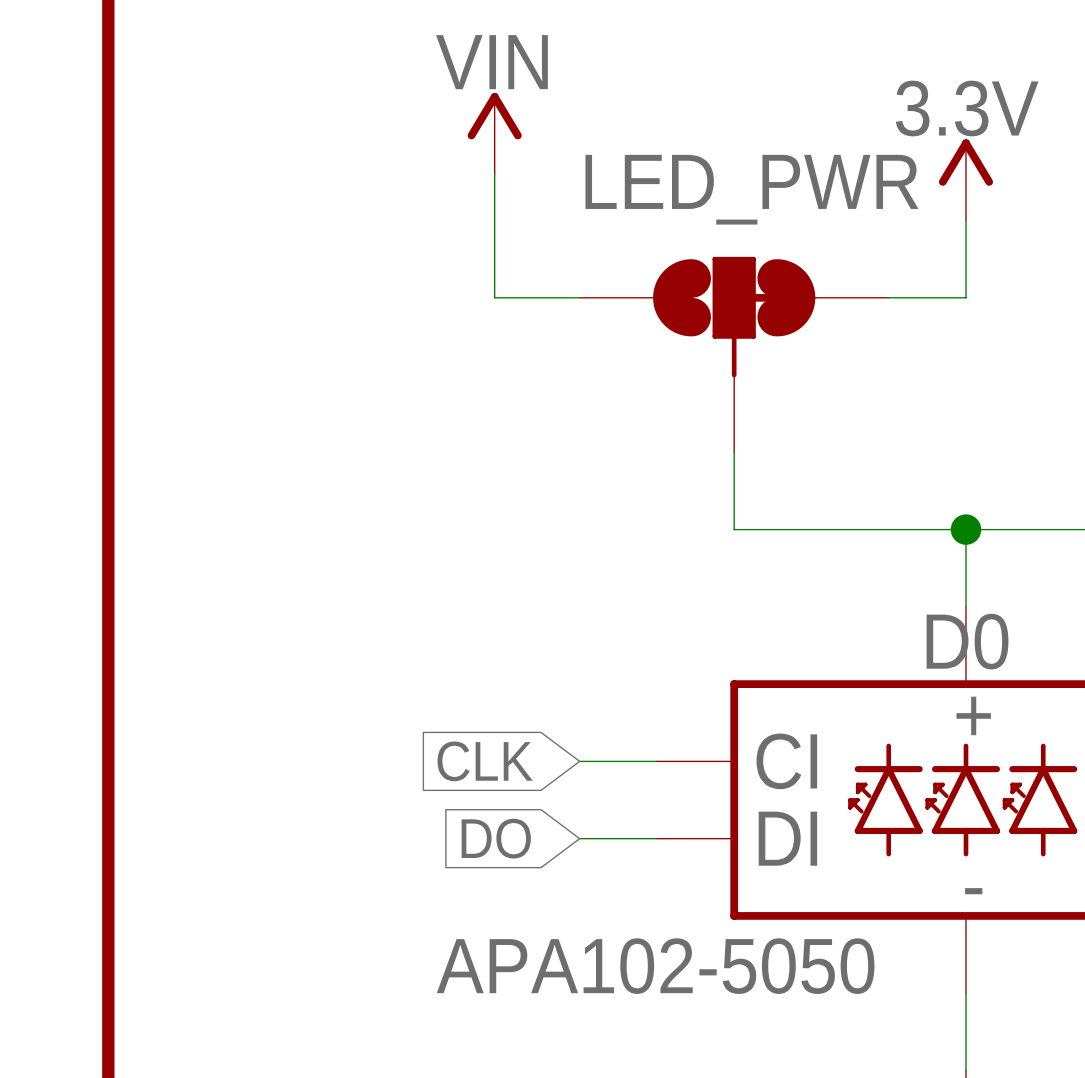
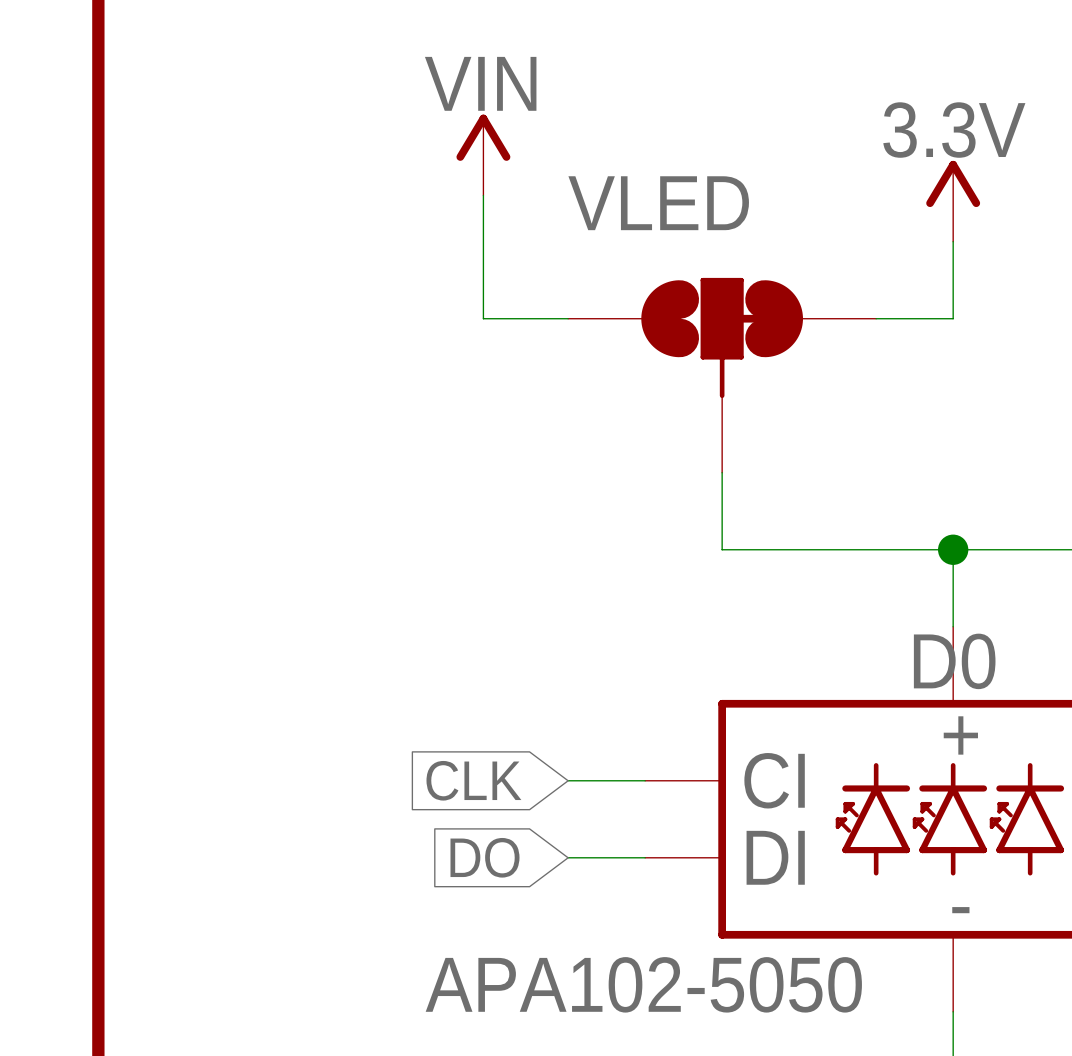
LED_PWR name: LED_PWR (751, 189) -> VLED (658, 203)

